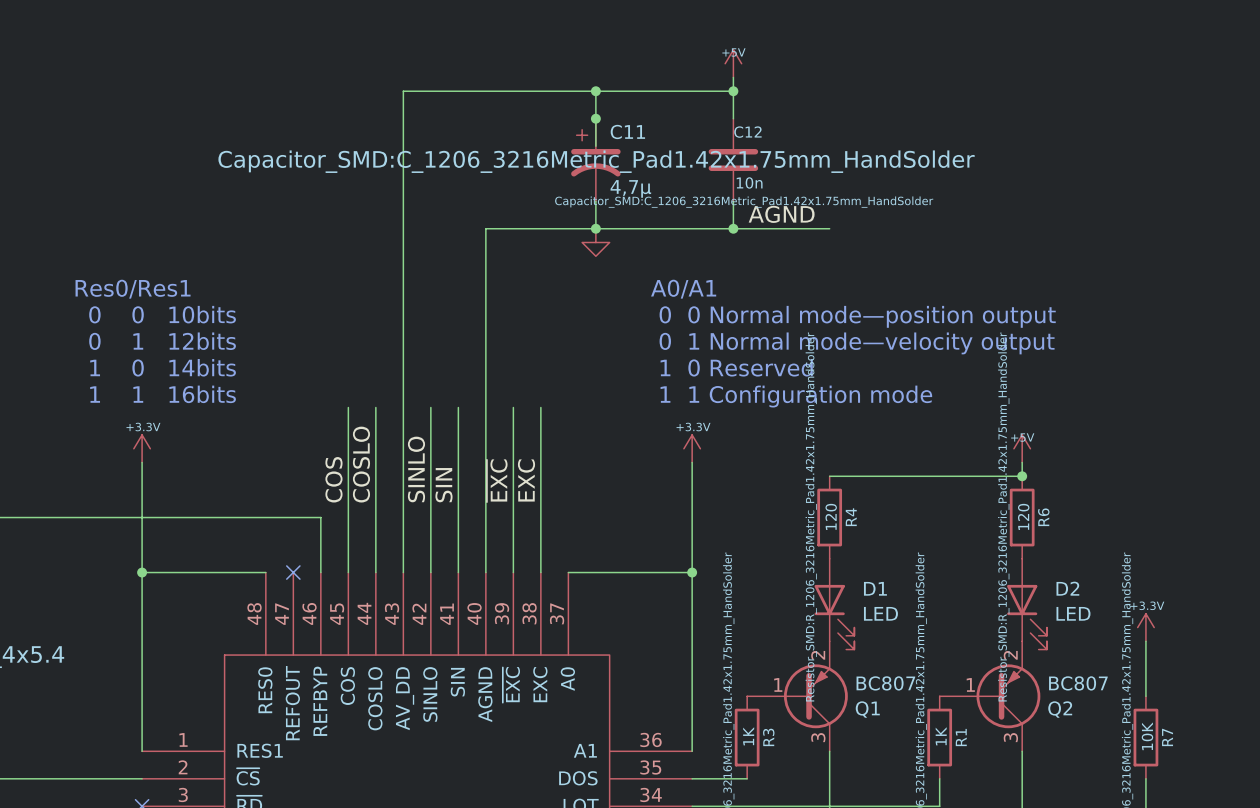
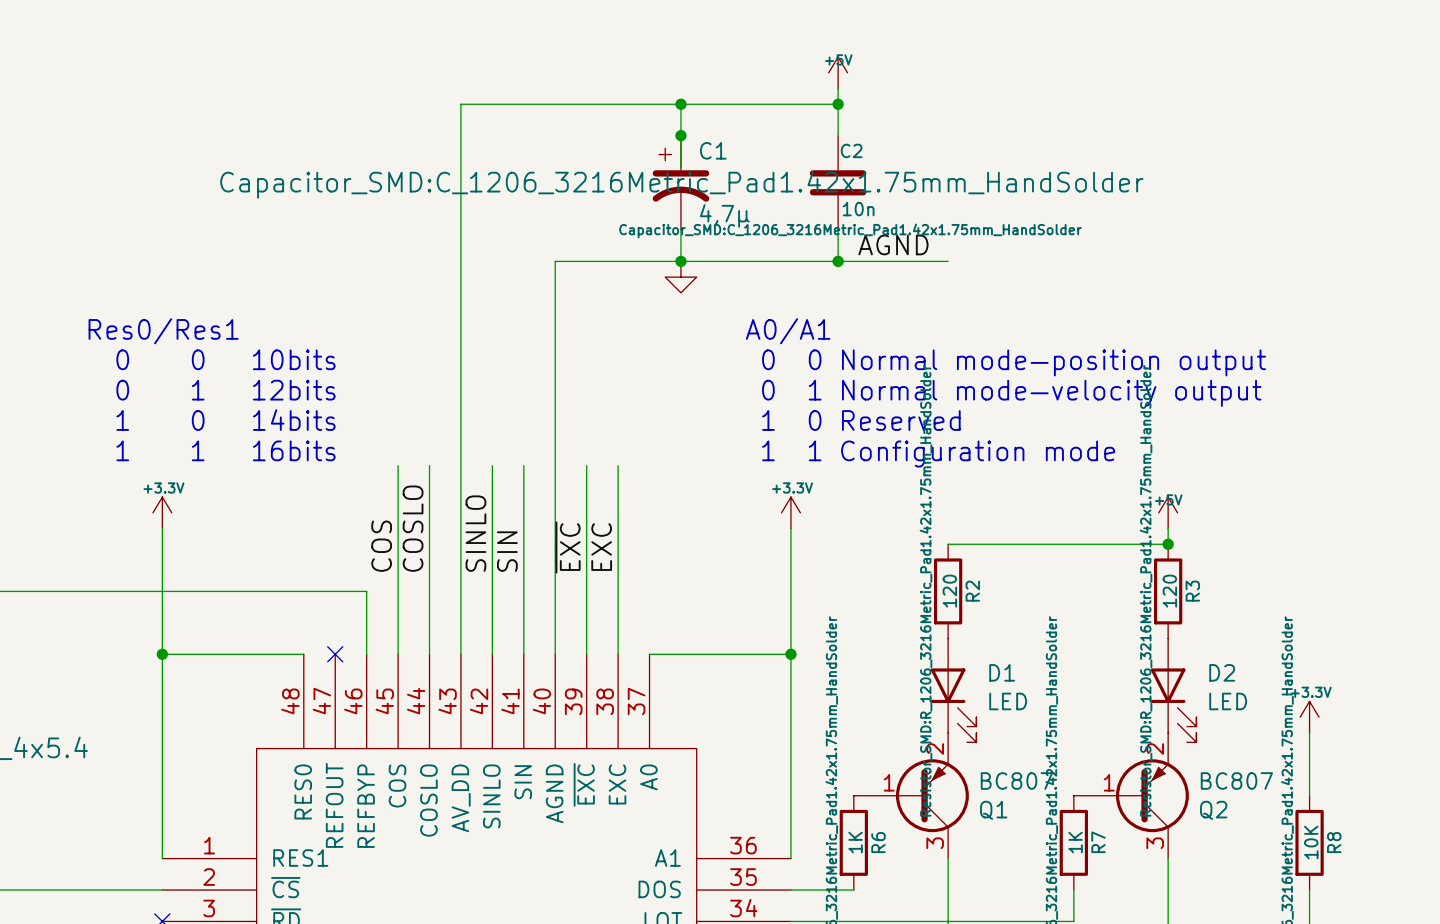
C11 name: C11 (627, 131) -> C1 (713, 150)
C12 name: C12 (747, 132) -> C2 (851, 150)
R4 name: R4 (851, 517) -> R2 (972, 591)
R6 name: R6 (1043, 517) -> R3 (1192, 591)
R3 name: R3 (768, 737) -> R6 (878, 842)
R1 name: R1 (961, 737) -> R7 (1098, 842)
R7 name: R7 (1167, 737) -> R8 (1334, 842)

